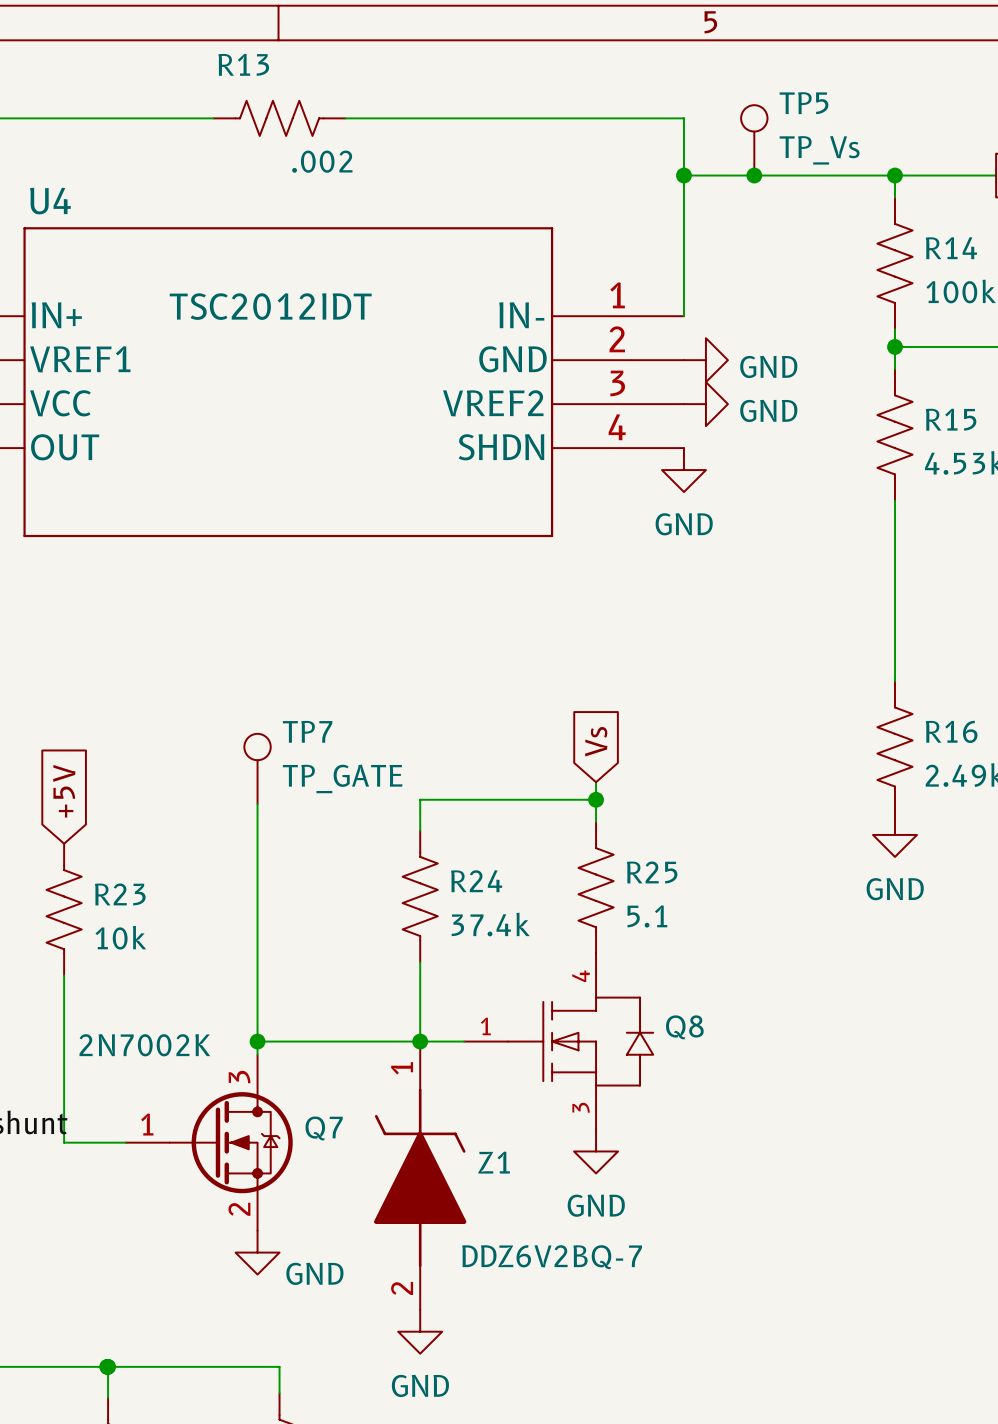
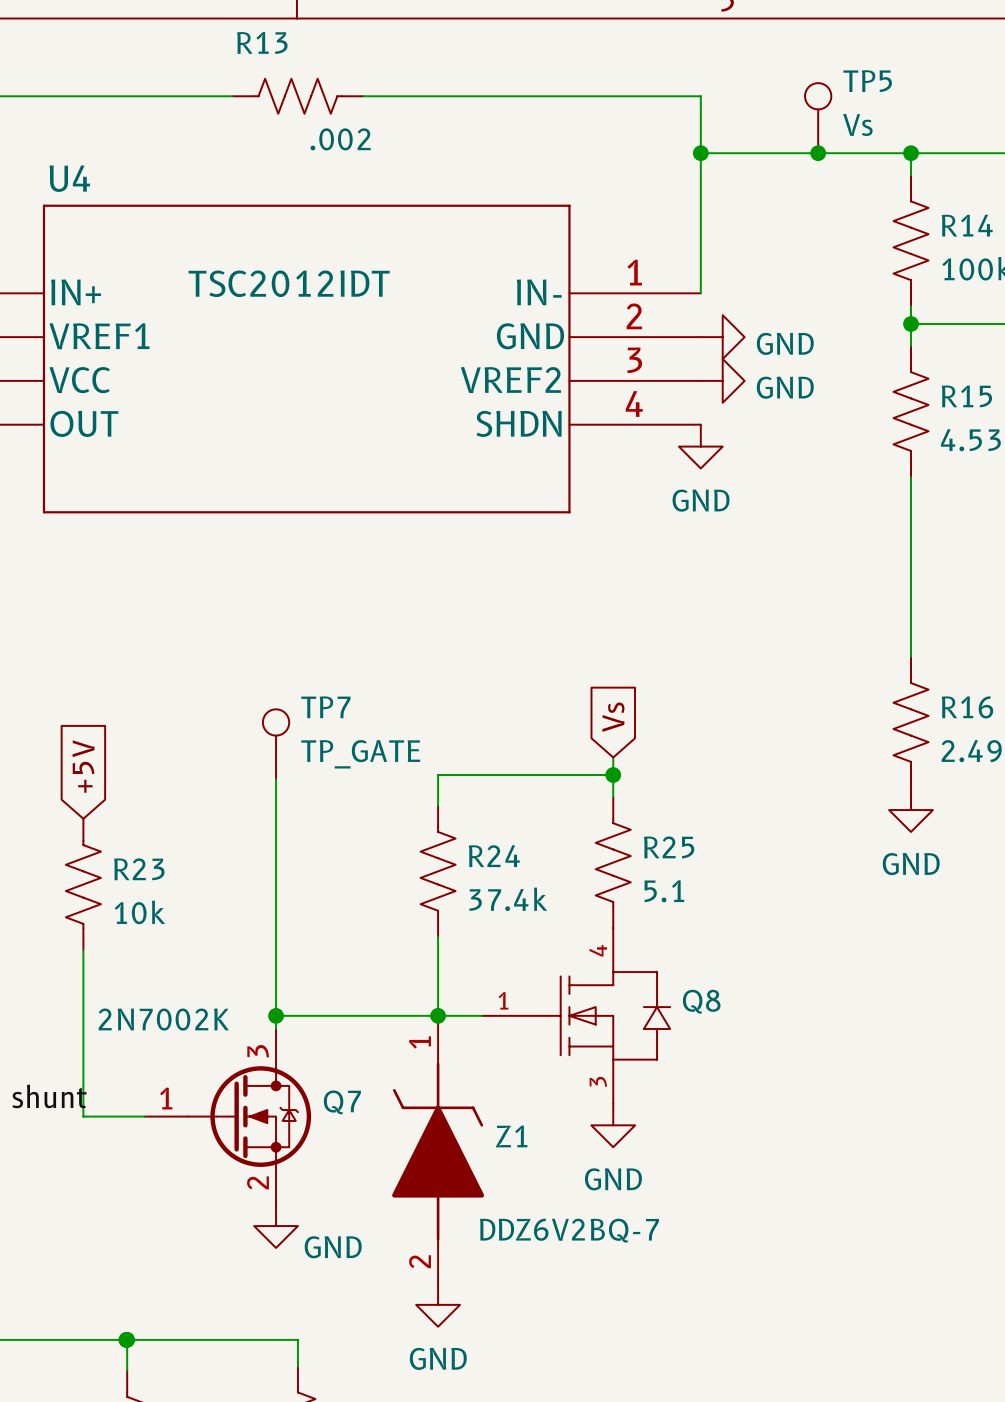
TP5 position: (754, 140) -> (818, 118)
TP5 value: TP_Vs (819, 150) -> Vs (857, 124)
junction position: (754, 175) -> (818, 153)

